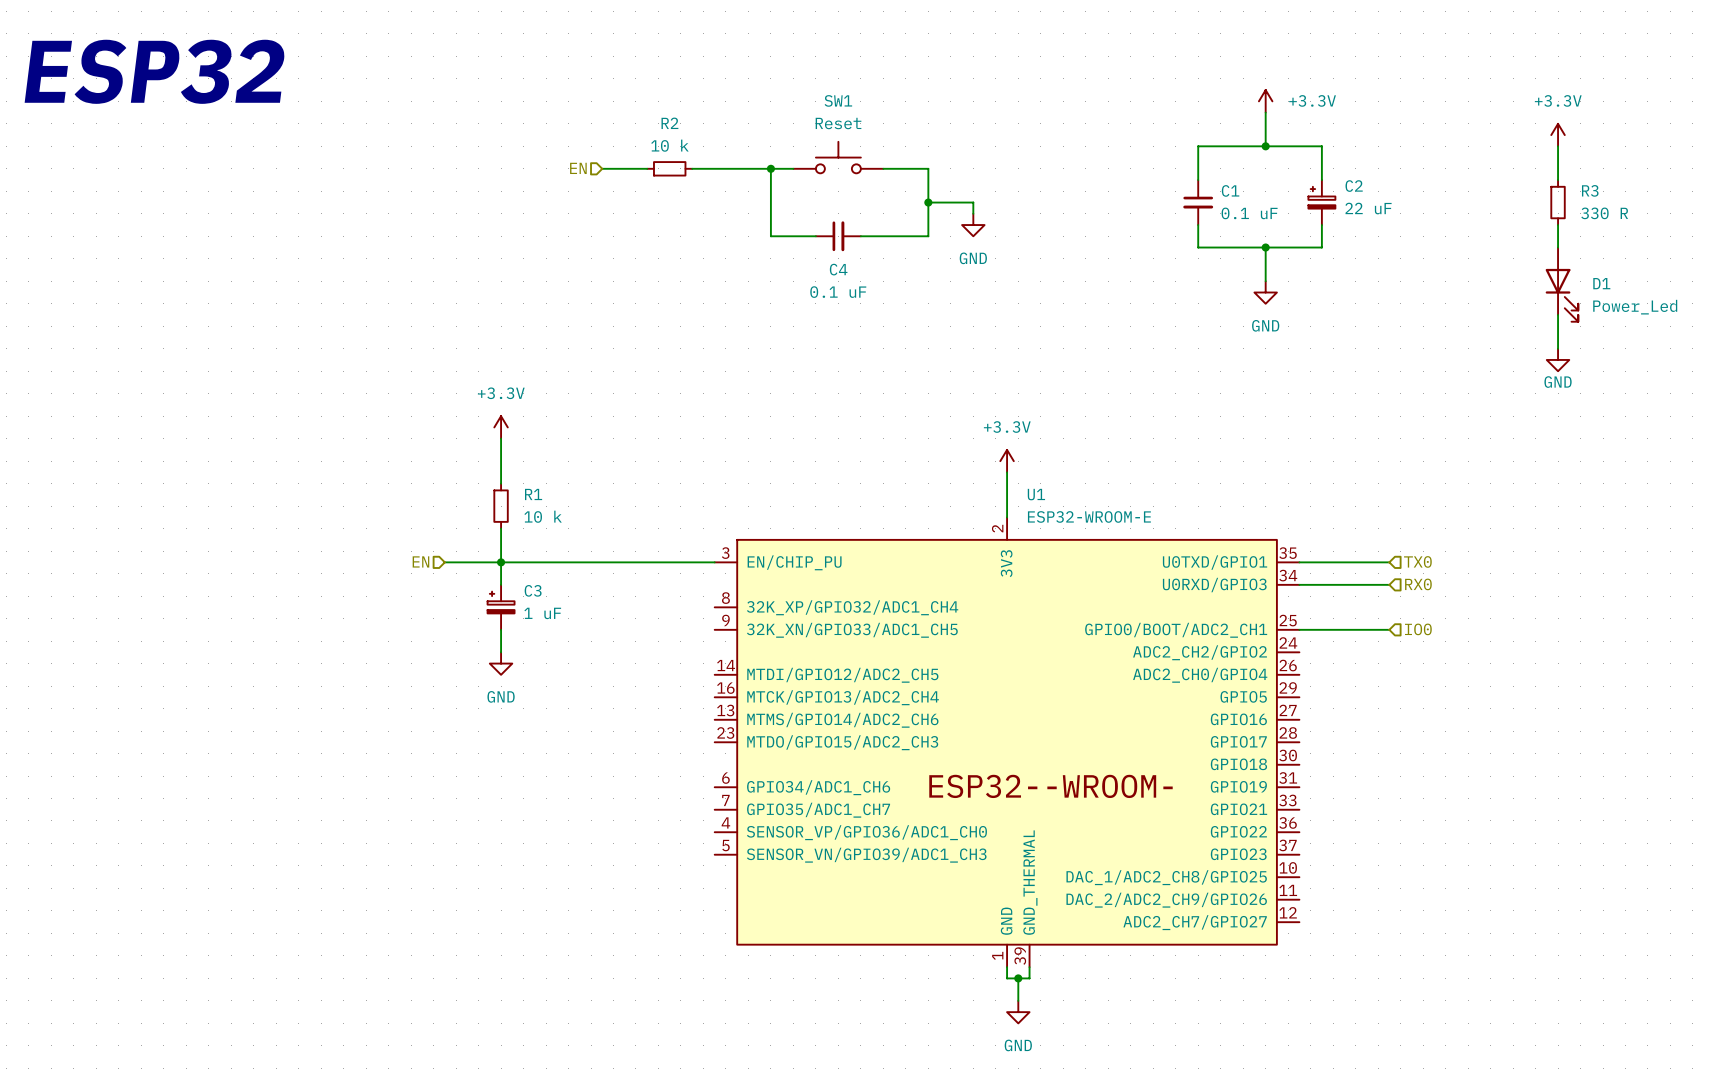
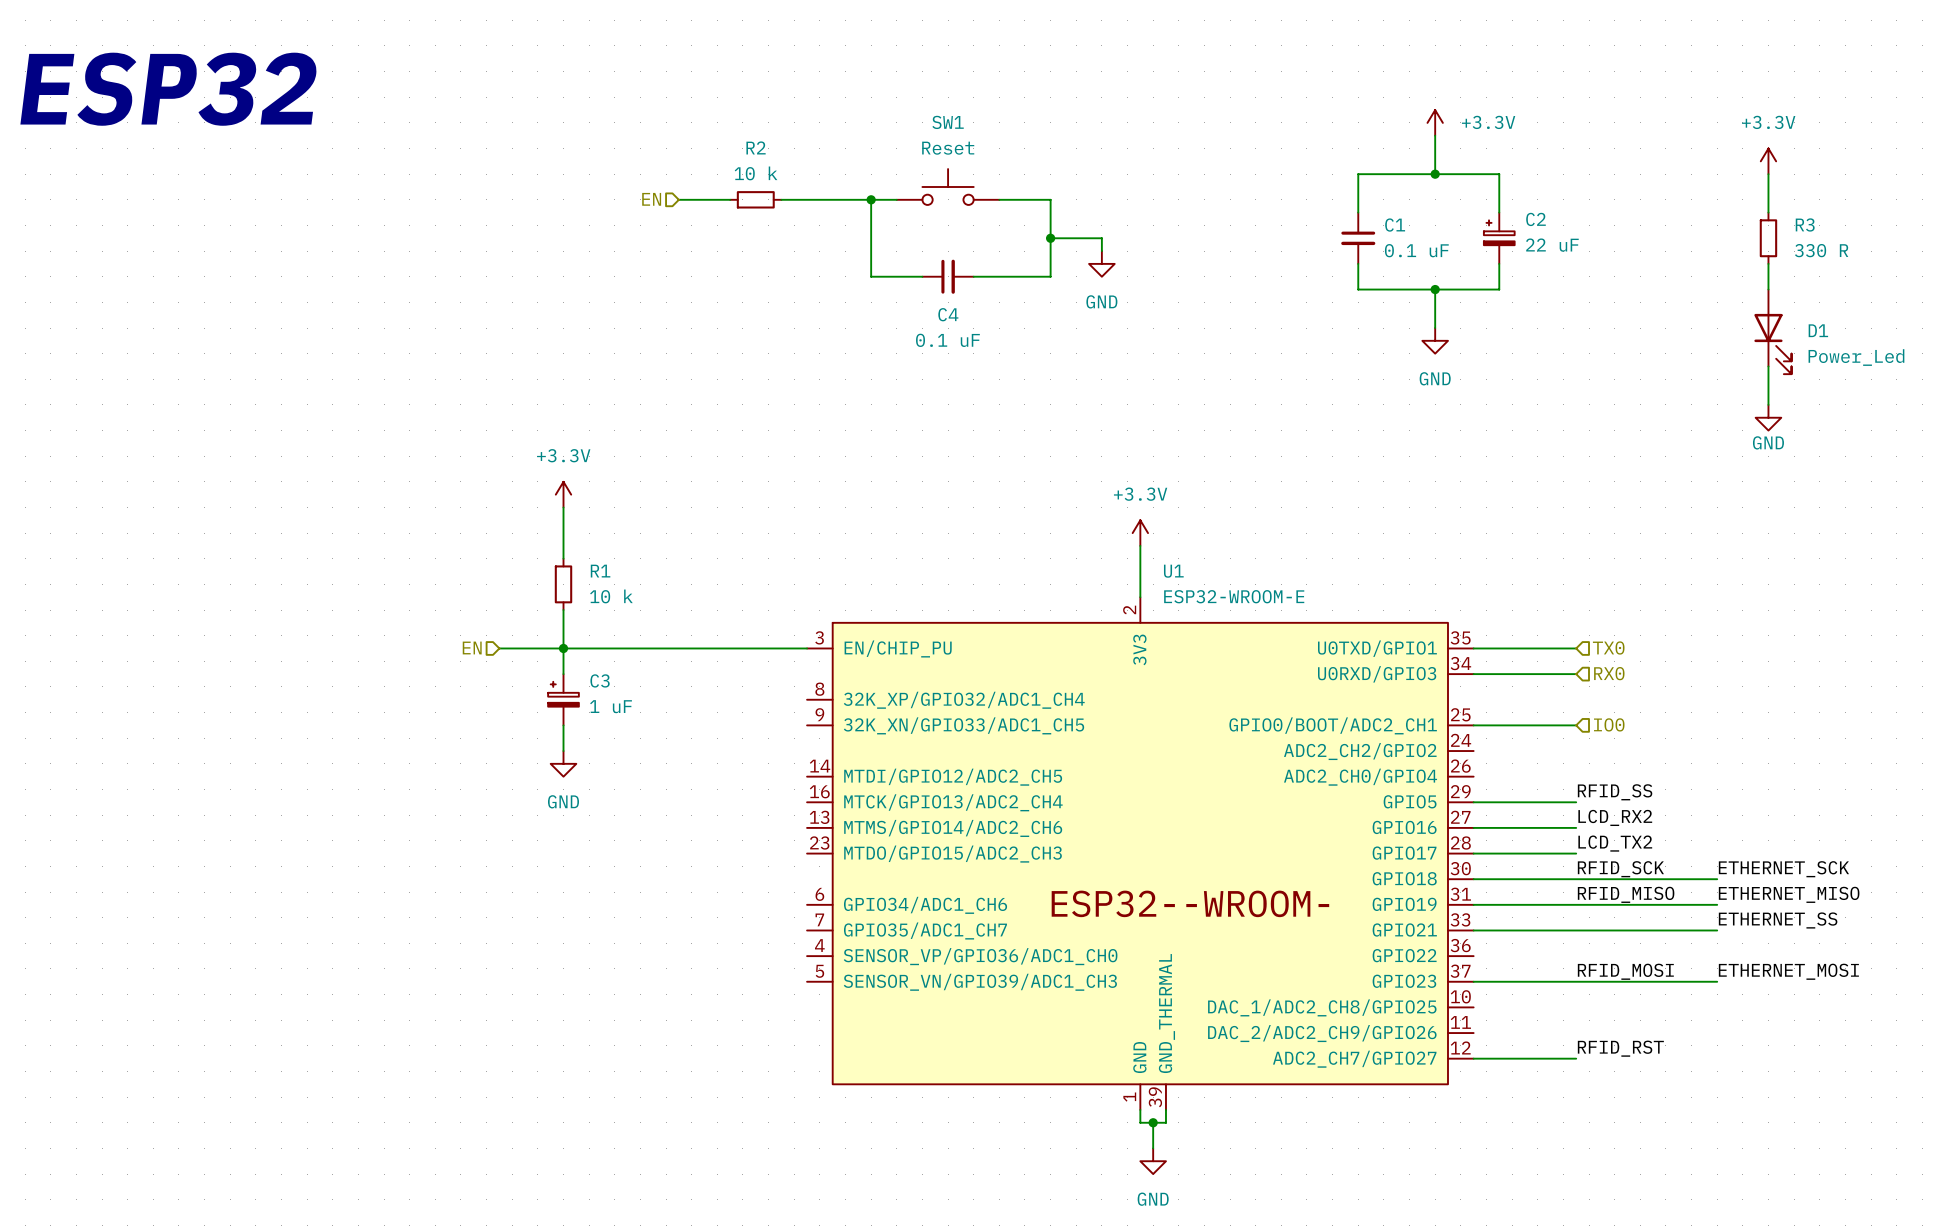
label: none -> RFID_SS (1615, 792)
wire: none -> (1473, 802) (1576, 802)
label: none -> LCD_RX2 (1615, 817)
wire: none -> (1473, 827) (1576, 827)
label: none -> LCD_TX2 (1615, 843)
wire: none -> (1473, 853) (1576, 853)
label: none -> RFID_SCK (1620, 869)
label: none -> ETHERNET_SCK (1783, 869)
wire: none -> (1473, 879) (1717, 879)
label: none -> RFID_MISO (1626, 894)
label: none -> ETHERNET_MISO (1789, 894)
wire: none -> (1473, 904) (1717, 904)
label: none -> ETHERNET_SS (1778, 920)
wire: none -> (1473, 930) (1717, 930)
label: none -> RFID_MOSI (1625, 971)
label: none -> ETHERNET_MOSI (1788, 971)
wire: none -> (1473, 981) (1717, 981)
label: none -> RFID_RST (1620, 1048)
wire: none -> (1473, 1058) (1576, 1058)

